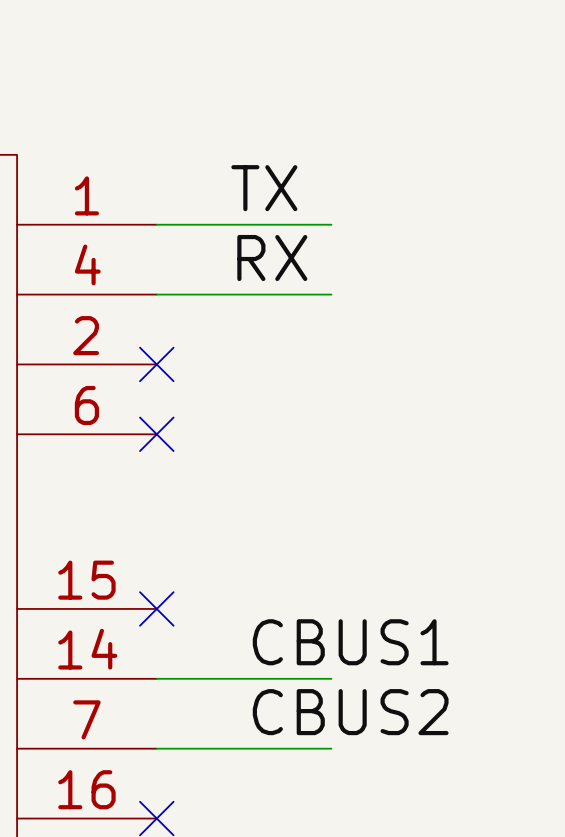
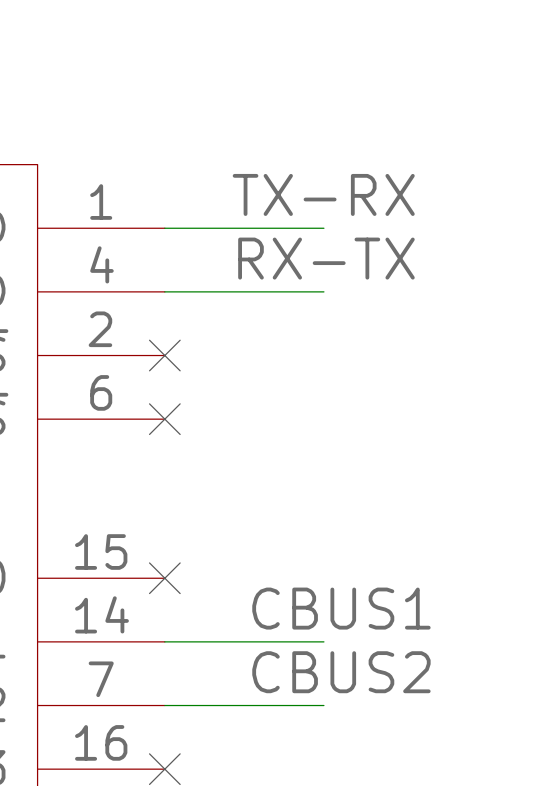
label: TX (264, 188) -> TX-RX (323, 194)
label: RX (272, 258) -> RX-TX (326, 258)

